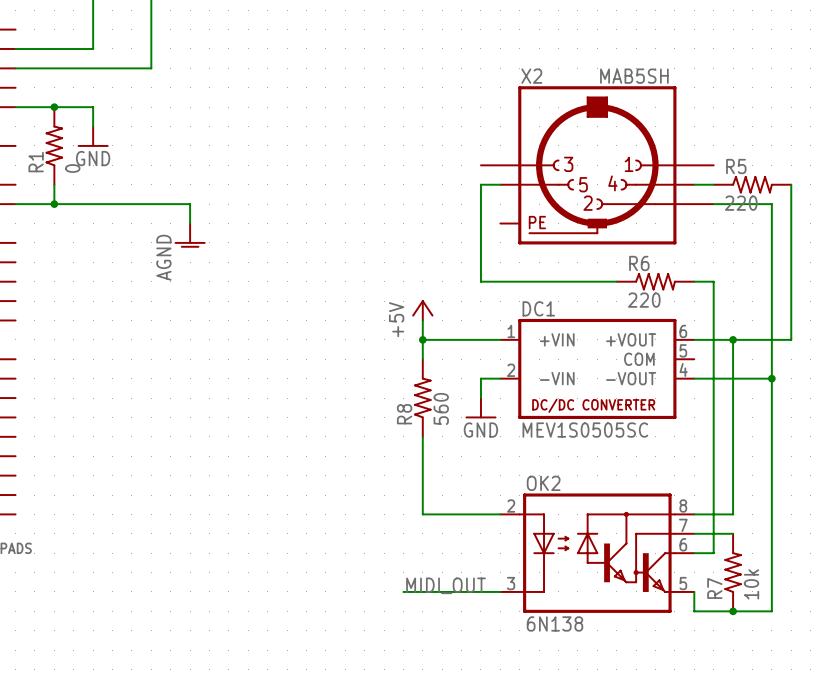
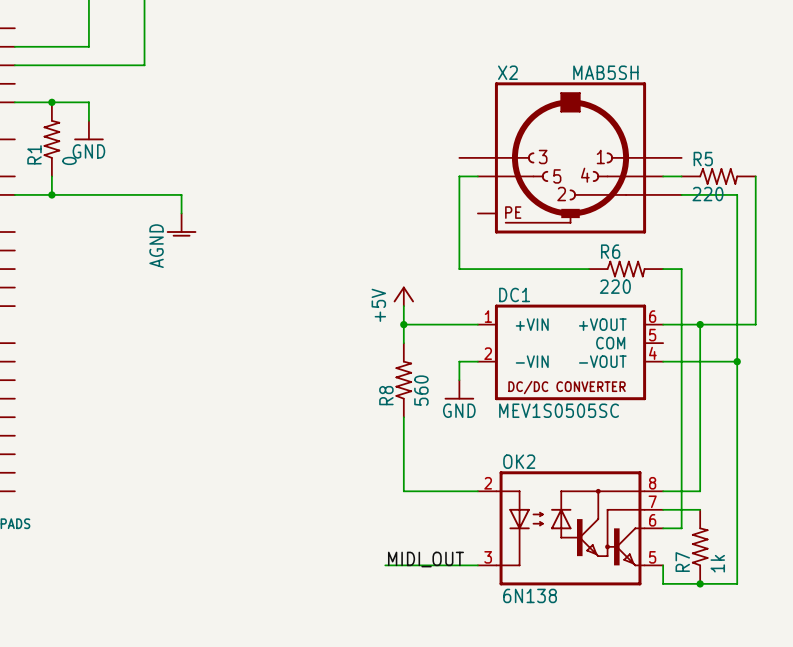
R7 value: 10k (751, 584) -> 1k (717, 563)

